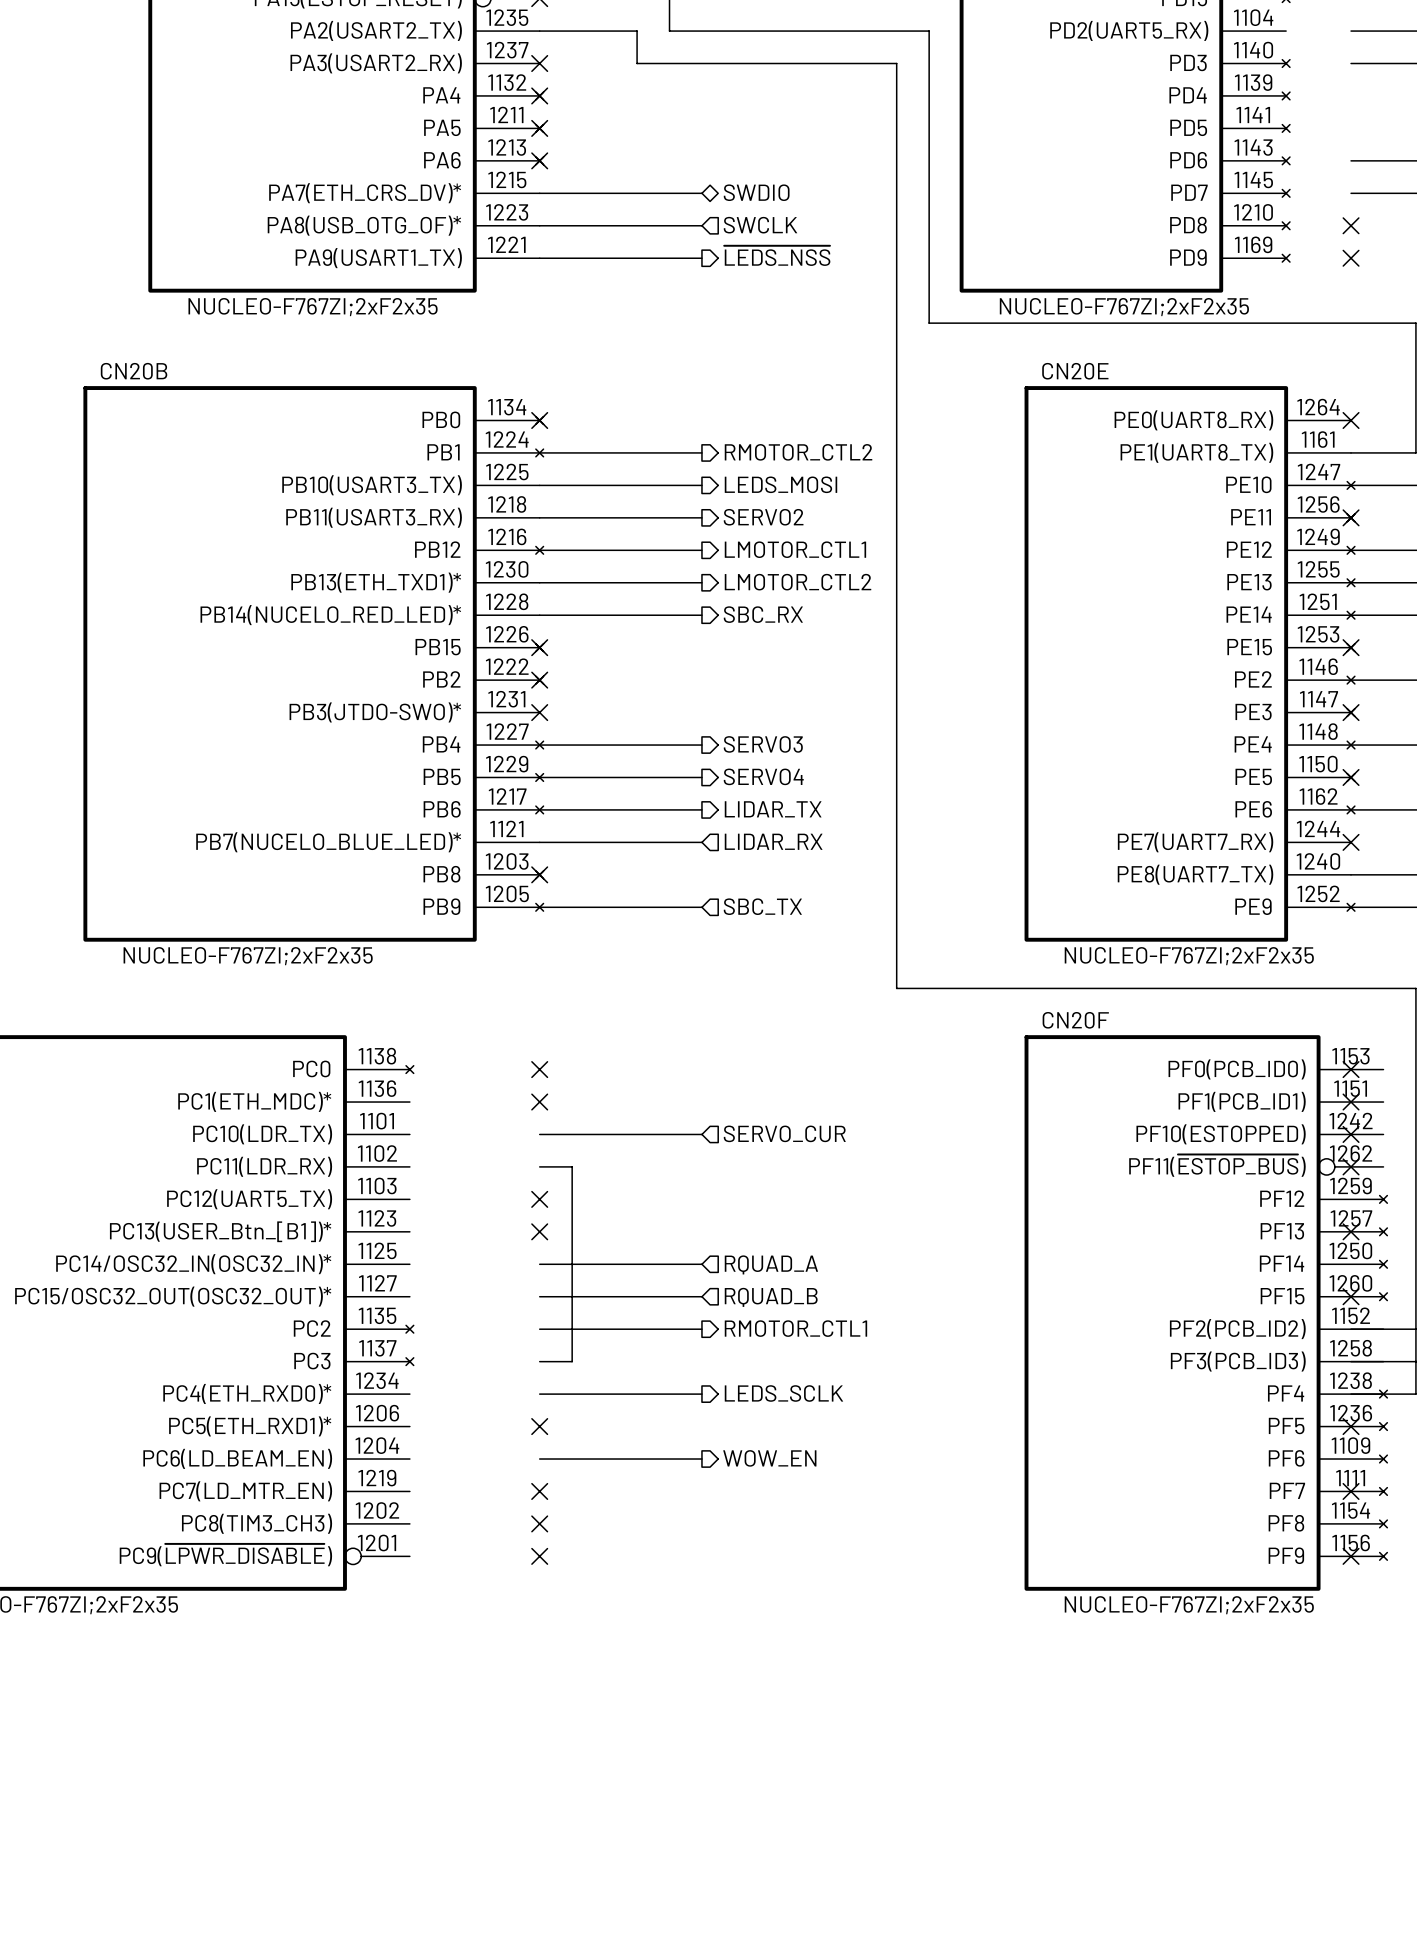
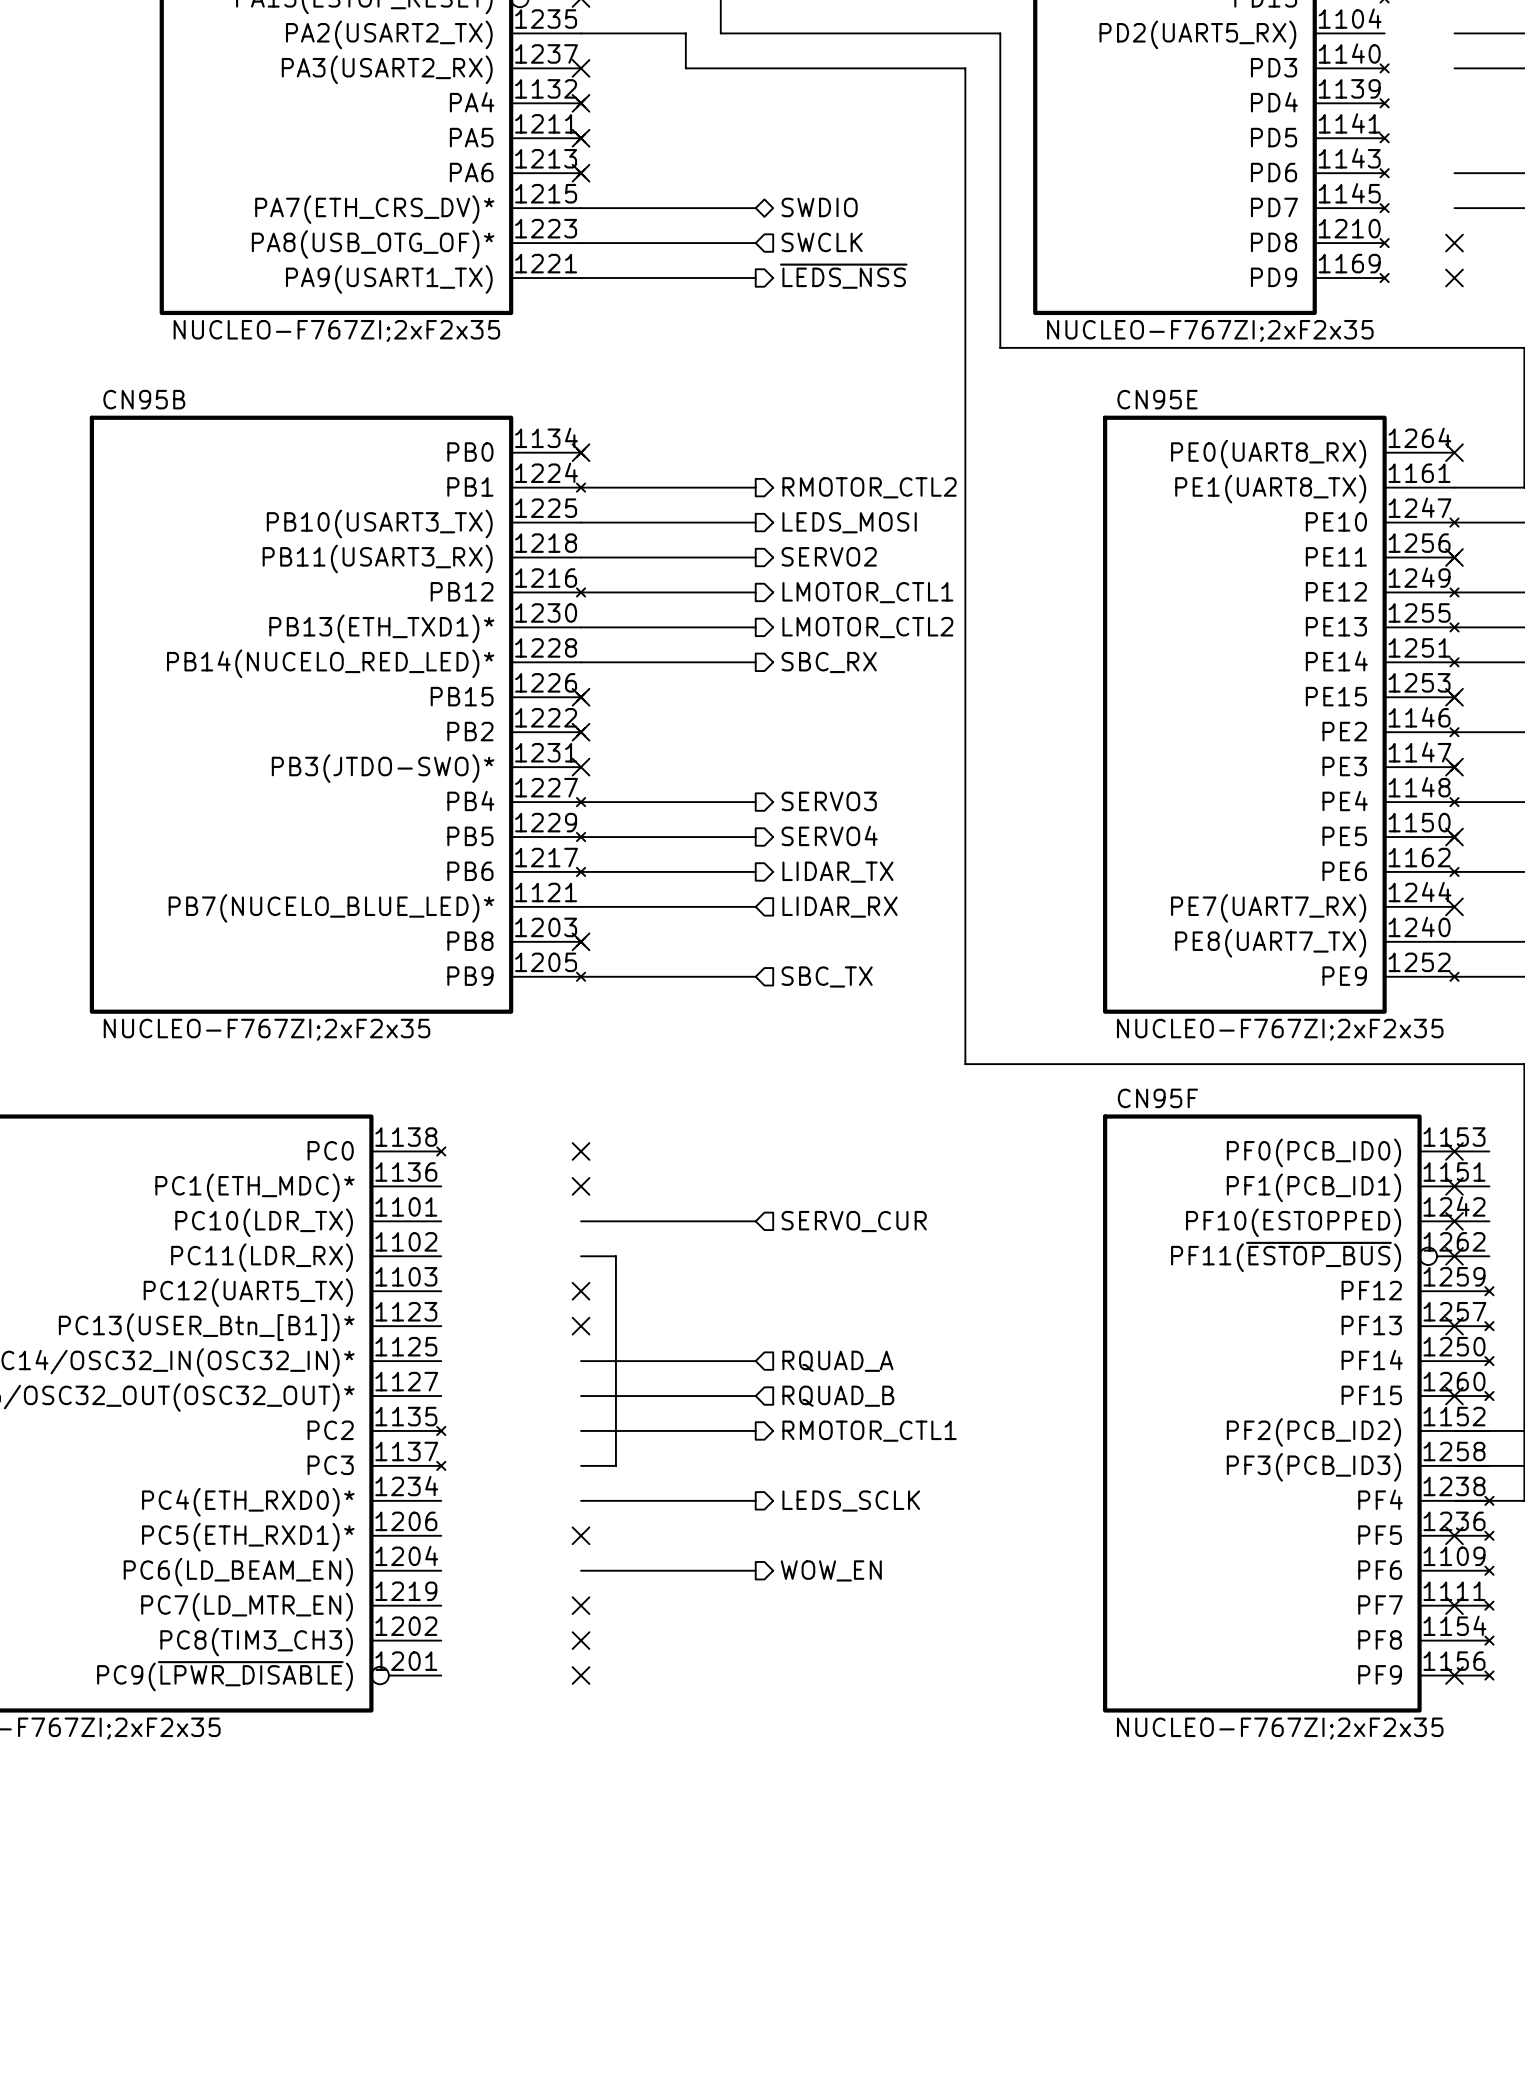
CN20B name: CN20B (134, 371) -> CN95B (144, 399)
CN20E name: CN20E (1075, 371) -> CN95E (1157, 399)
CN20F name: CN20F (1075, 1020) -> CN95F (1157, 1098)

